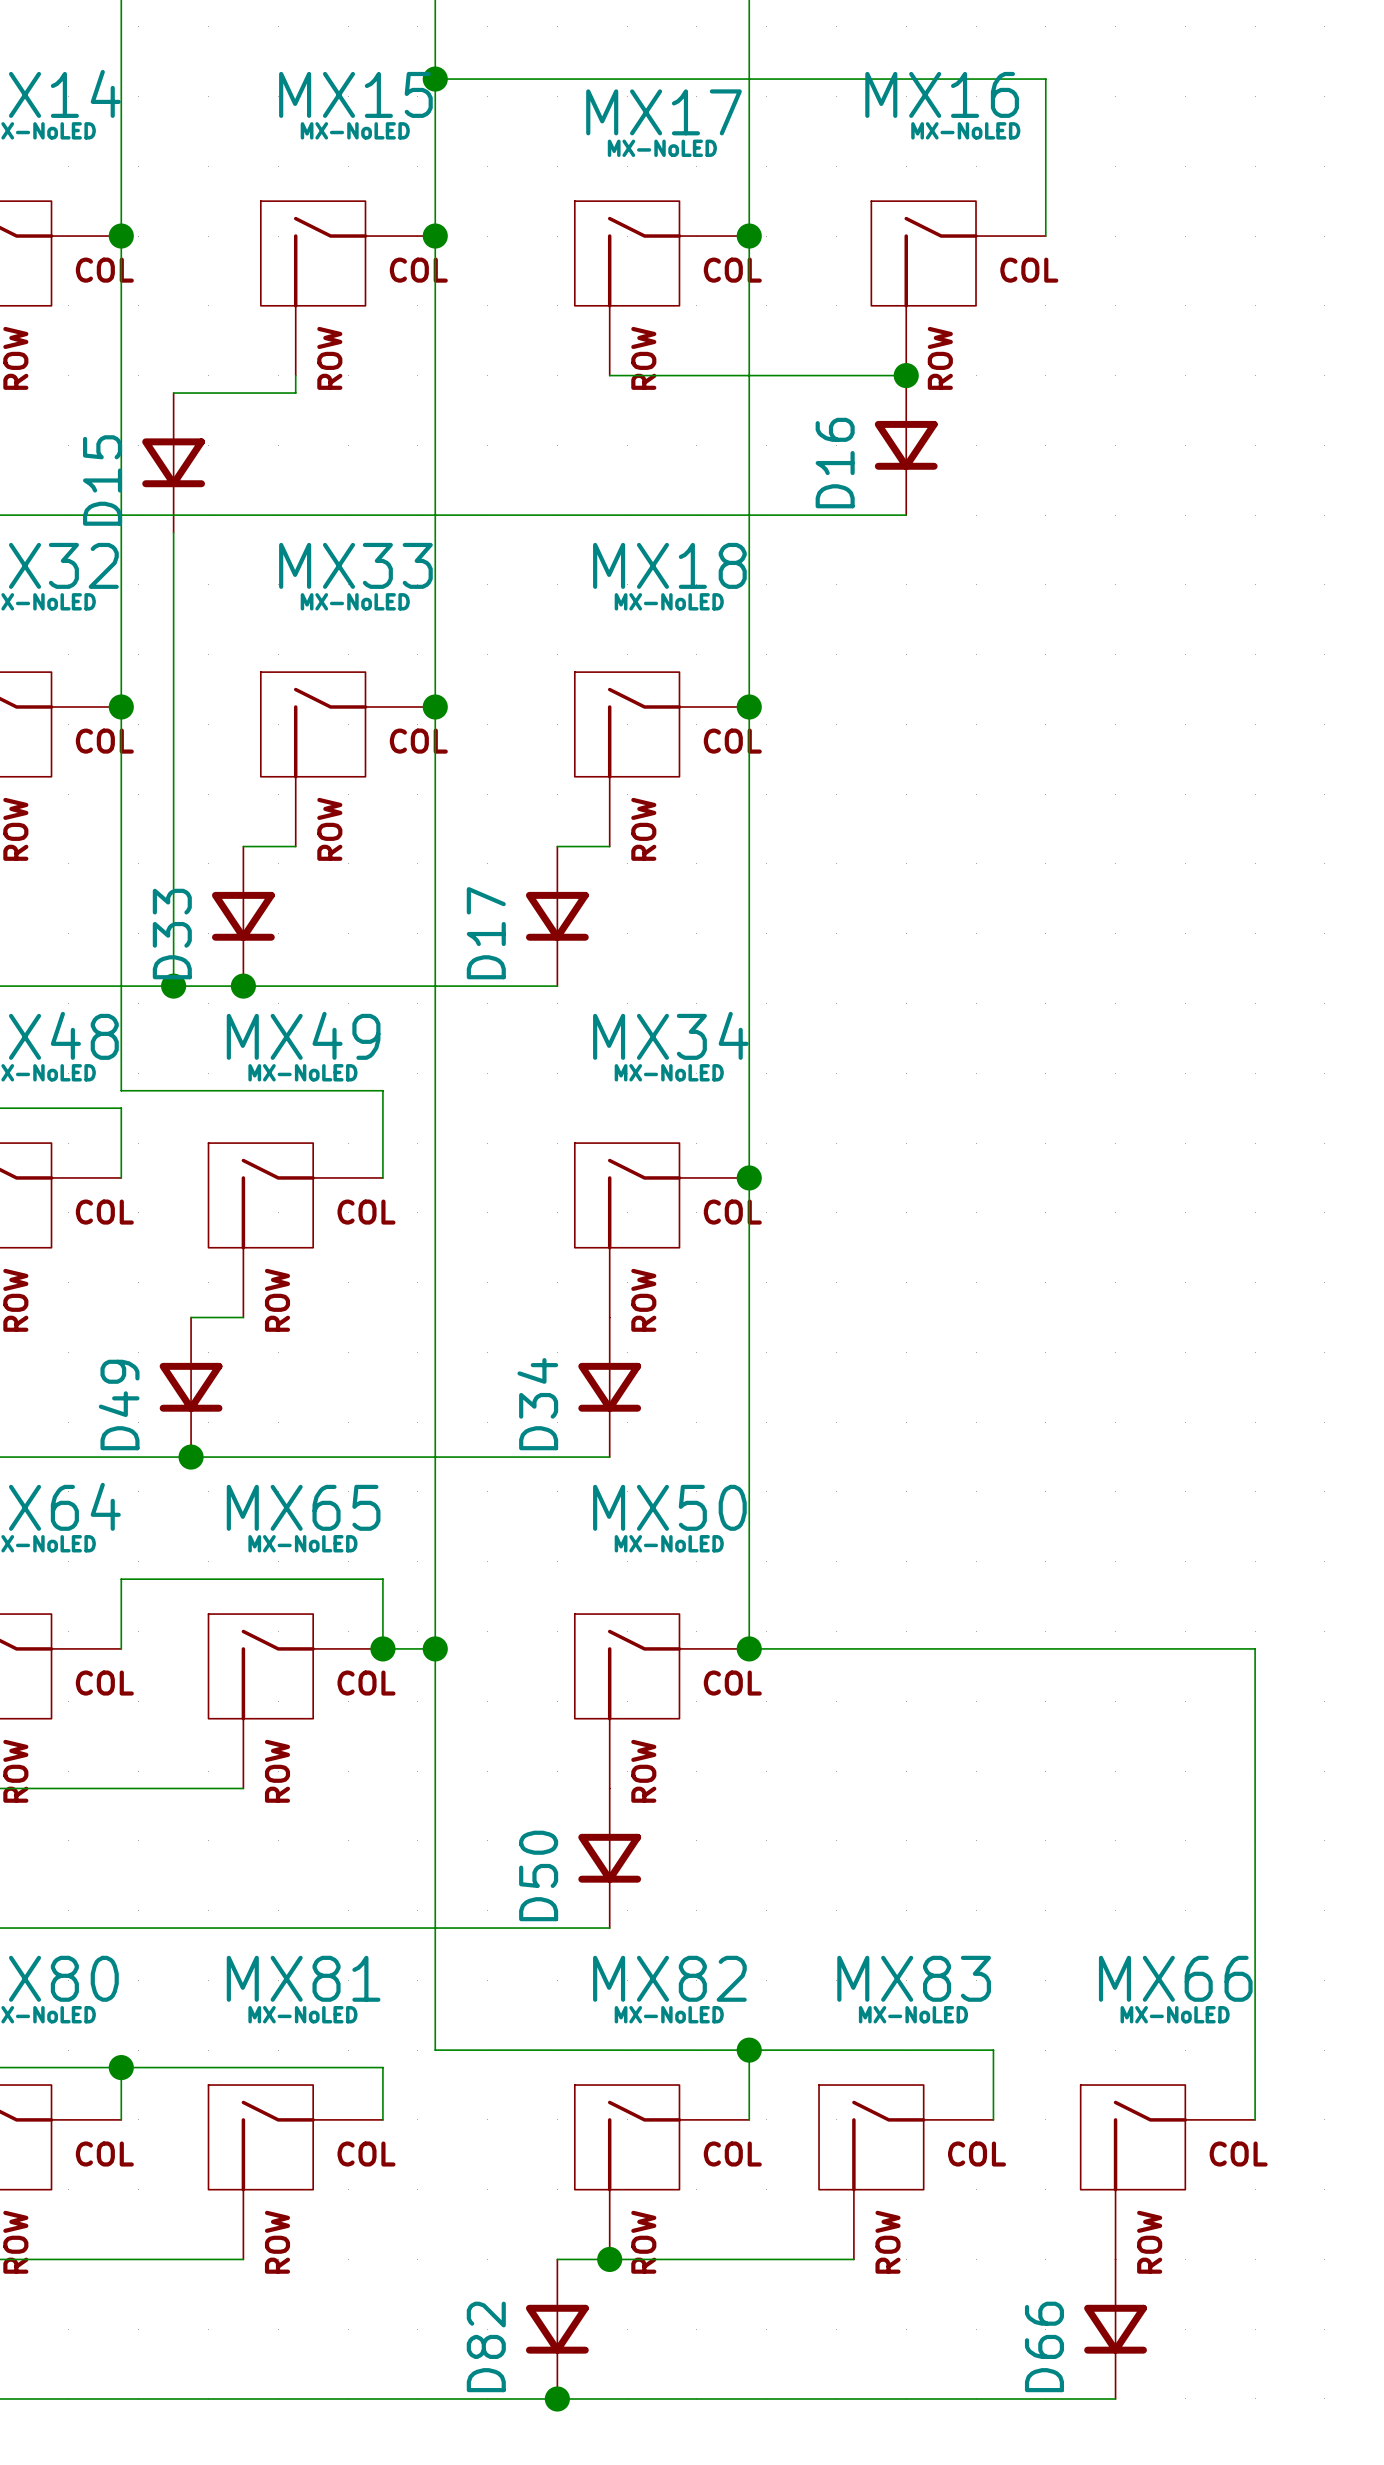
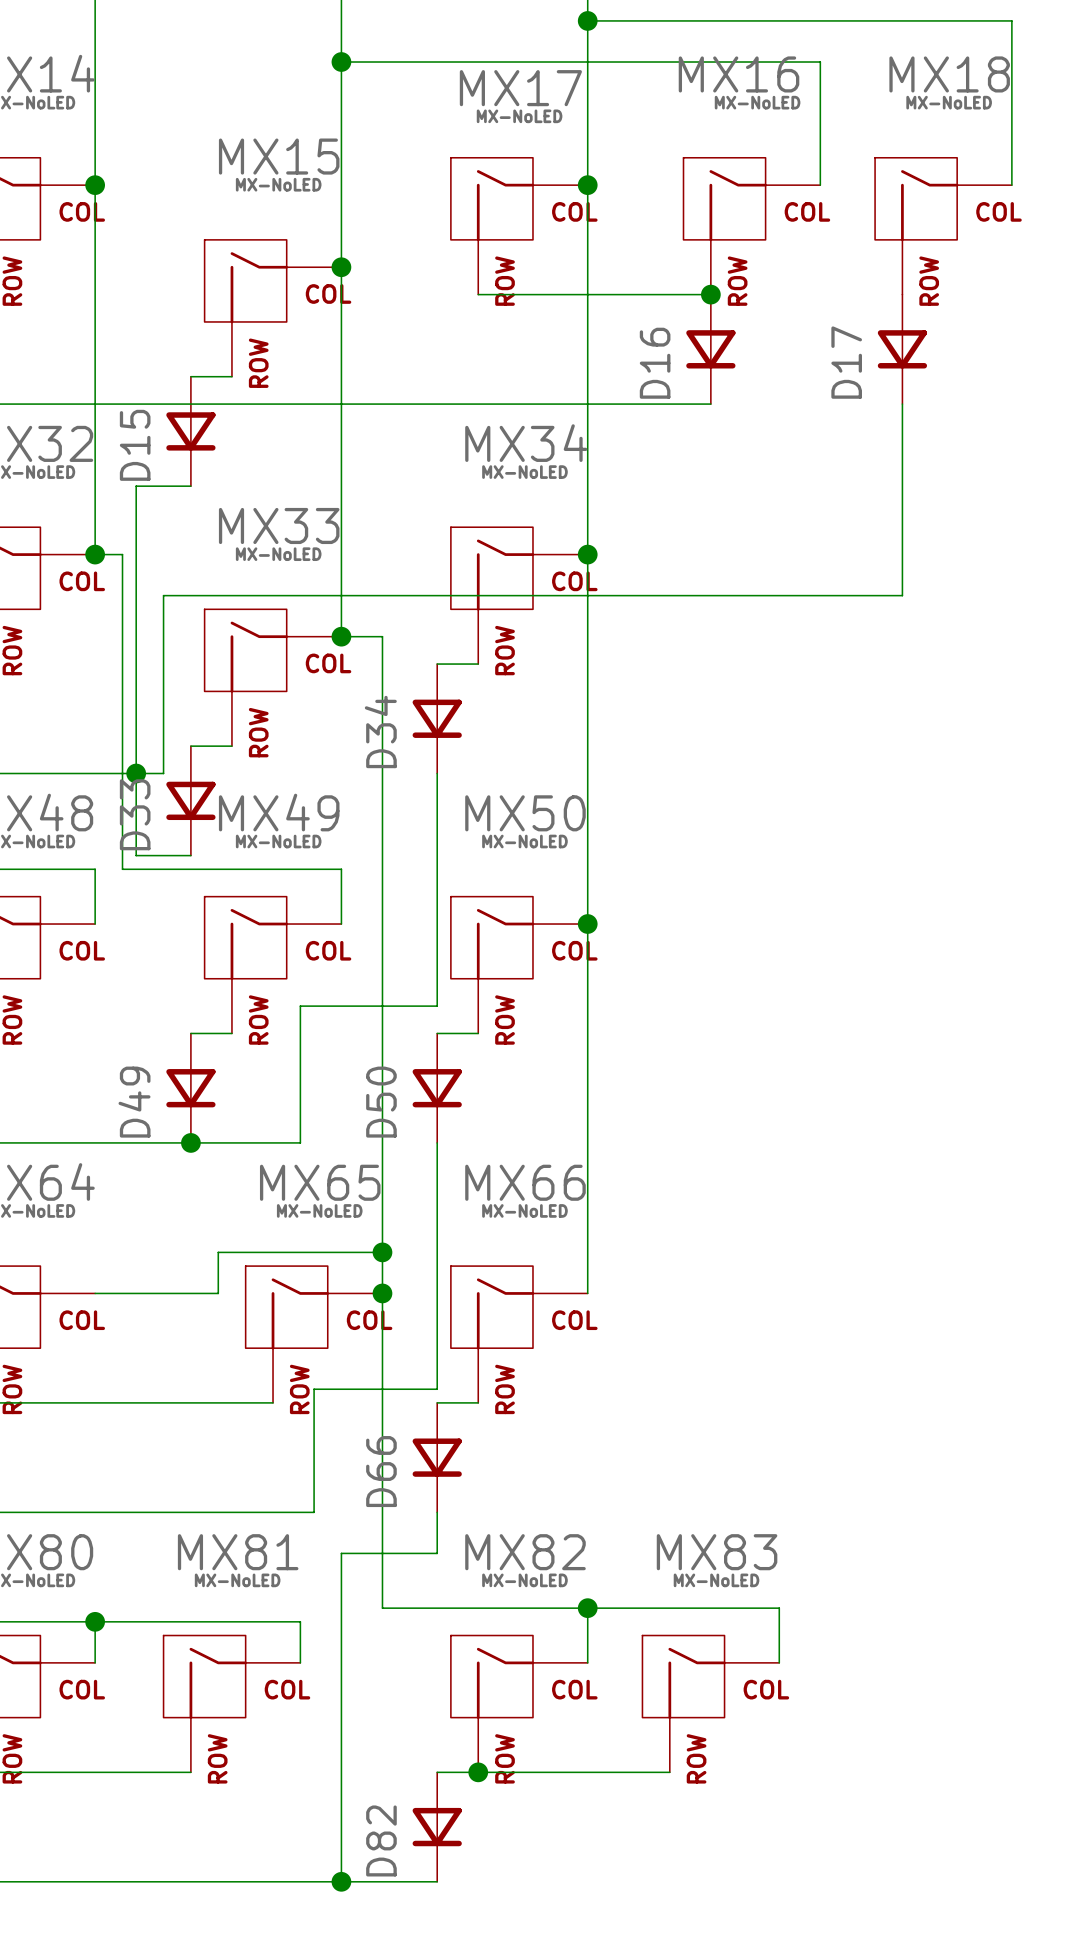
wire: none -> (587, 20) (1011, 20) (1011, 185)
junction: none -> (587, 20)
junction position: (435, 236) -> (341, 267)
MX15 position: (348, 288) -> (273, 308)
MX18: none -> MX-NoLED (943, 226)
wire: (295, 375) (295, 393) (173, 393) -> none
D17: none -> (902, 349)
D15 position: (173, 462) -> (190, 431)
wire: none -> (190, 376) (231, 376)
wire: (173, 532) (173, 619) -> (190, 486) (136, 486)
MX18 name: MX18 (669, 565) -> MX34 (526, 443)
wire: (121, 707) (121, 1090) (173, 1090) -> (95, 554) (122, 554) (122, 869) (341, 869)
junction position: (435, 707) -> (341, 636)
MX33 position: (348, 759) -> (273, 677)
wire: (435, 811) (435, 1108) -> (341, 636) (382, 636) (382, 1608)
wire: (243, 846) (295, 846) -> (190, 746) (231, 746)
D33 position: (243, 916) -> (190, 800)
D17 name: D17 (486, 933) -> D34 (380, 732)
wire: none -> (136, 773) (136, 855)
wire: (208, 986) (557, 986) -> (163, 773) (163, 595) (902, 595) (902, 404)
junction: (243, 986) -> none
MX34 name: MX34 (670, 1035) -> MX50 (525, 813)
wire: (243, 1090) (382, 1090) (382, 1177) -> none
wire: (435, 1177) (435, 1980) -> (437, 1512) (437, 1553) (341, 1553)
MX49 position: (295, 1230) -> (273, 965)
wire: (191, 1317) (243, 1317) -> (231, 1033) (190, 1033)
wire: none -> (437, 1033) (478, 1033)
D49 position: (191, 1387) -> (190, 1088)
D34: (609, 1387) -> none
junction position: (191, 1457) -> (190, 1142)
wire: (382, 1457) (609, 1457) -> (300, 1142) (300, 1006) (437, 1006) (437, 773)
MX50 name: MX50 (669, 1507) -> MX66 (525, 1182)
junction: none -> (382, 1252)
wire: (121, 1648) (121, 1579) (382, 1579) (382, 1648) (435, 1648) -> (95, 1293) (218, 1293) (218, 1252) (382, 1252)
junction: (382, 1648) -> none
junction: (435, 1648) -> none
junction: none -> (382, 1293)
wire: (749, 1648) (1255, 1648) (1255, 2119) -> none
junction: (749, 1648) -> none
MX65 position: (295, 1701) -> (314, 1334)
wire: none -> (190, 1402) (273, 1402)
wire: none -> (437, 1402) (478, 1402)
D50 position: (609, 1858) -> (437, 1088)
wire: (400, 1928) (609, 1928) -> (314, 1512) (314, 1389) (437, 1389) (437, 1142)
wire: (435, 2050) (487, 2050) -> (341, 1608) (341, 1881)
MX66: MX-NoLED (1167, 2172) -> none
D66 position: (1115, 2329) -> (437, 1457)
wire: (557, 2398) (1115, 2398) -> none
junction position: (557, 2398) -> (341, 1881)

